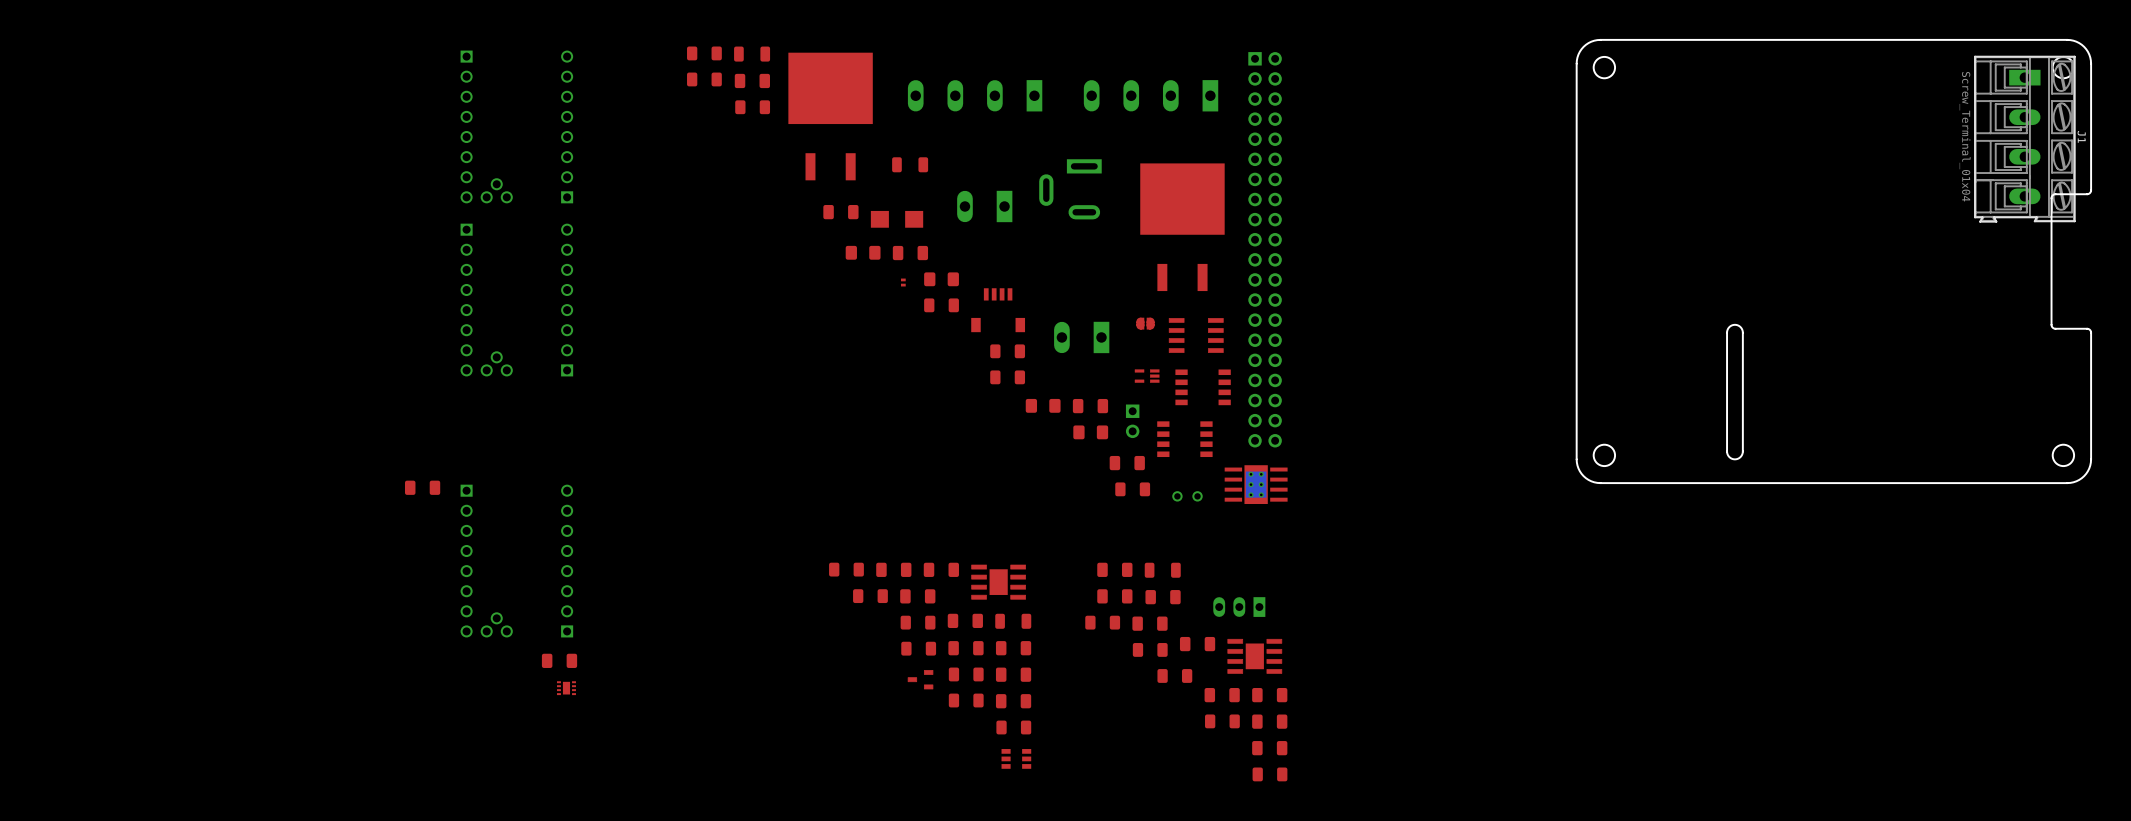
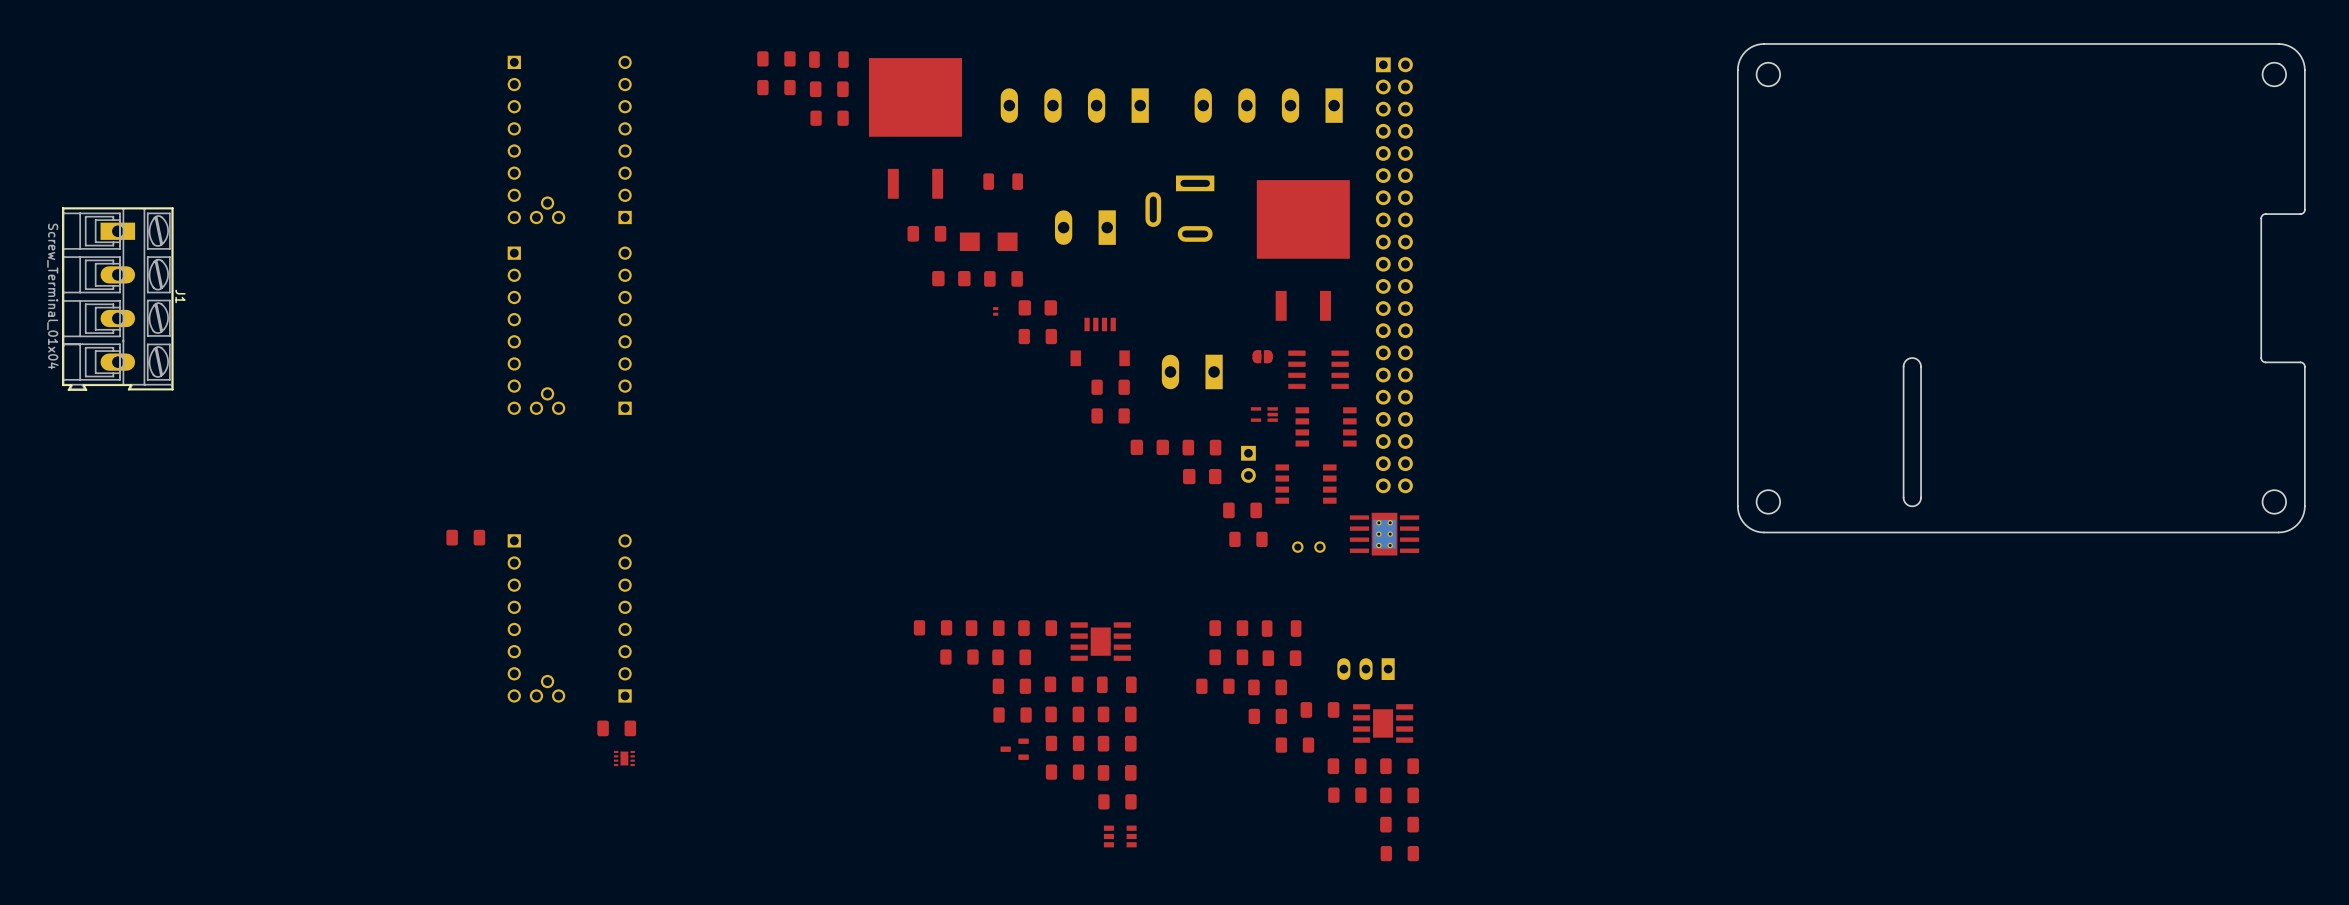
J1 position: (2024, 139) -> (117, 299)

